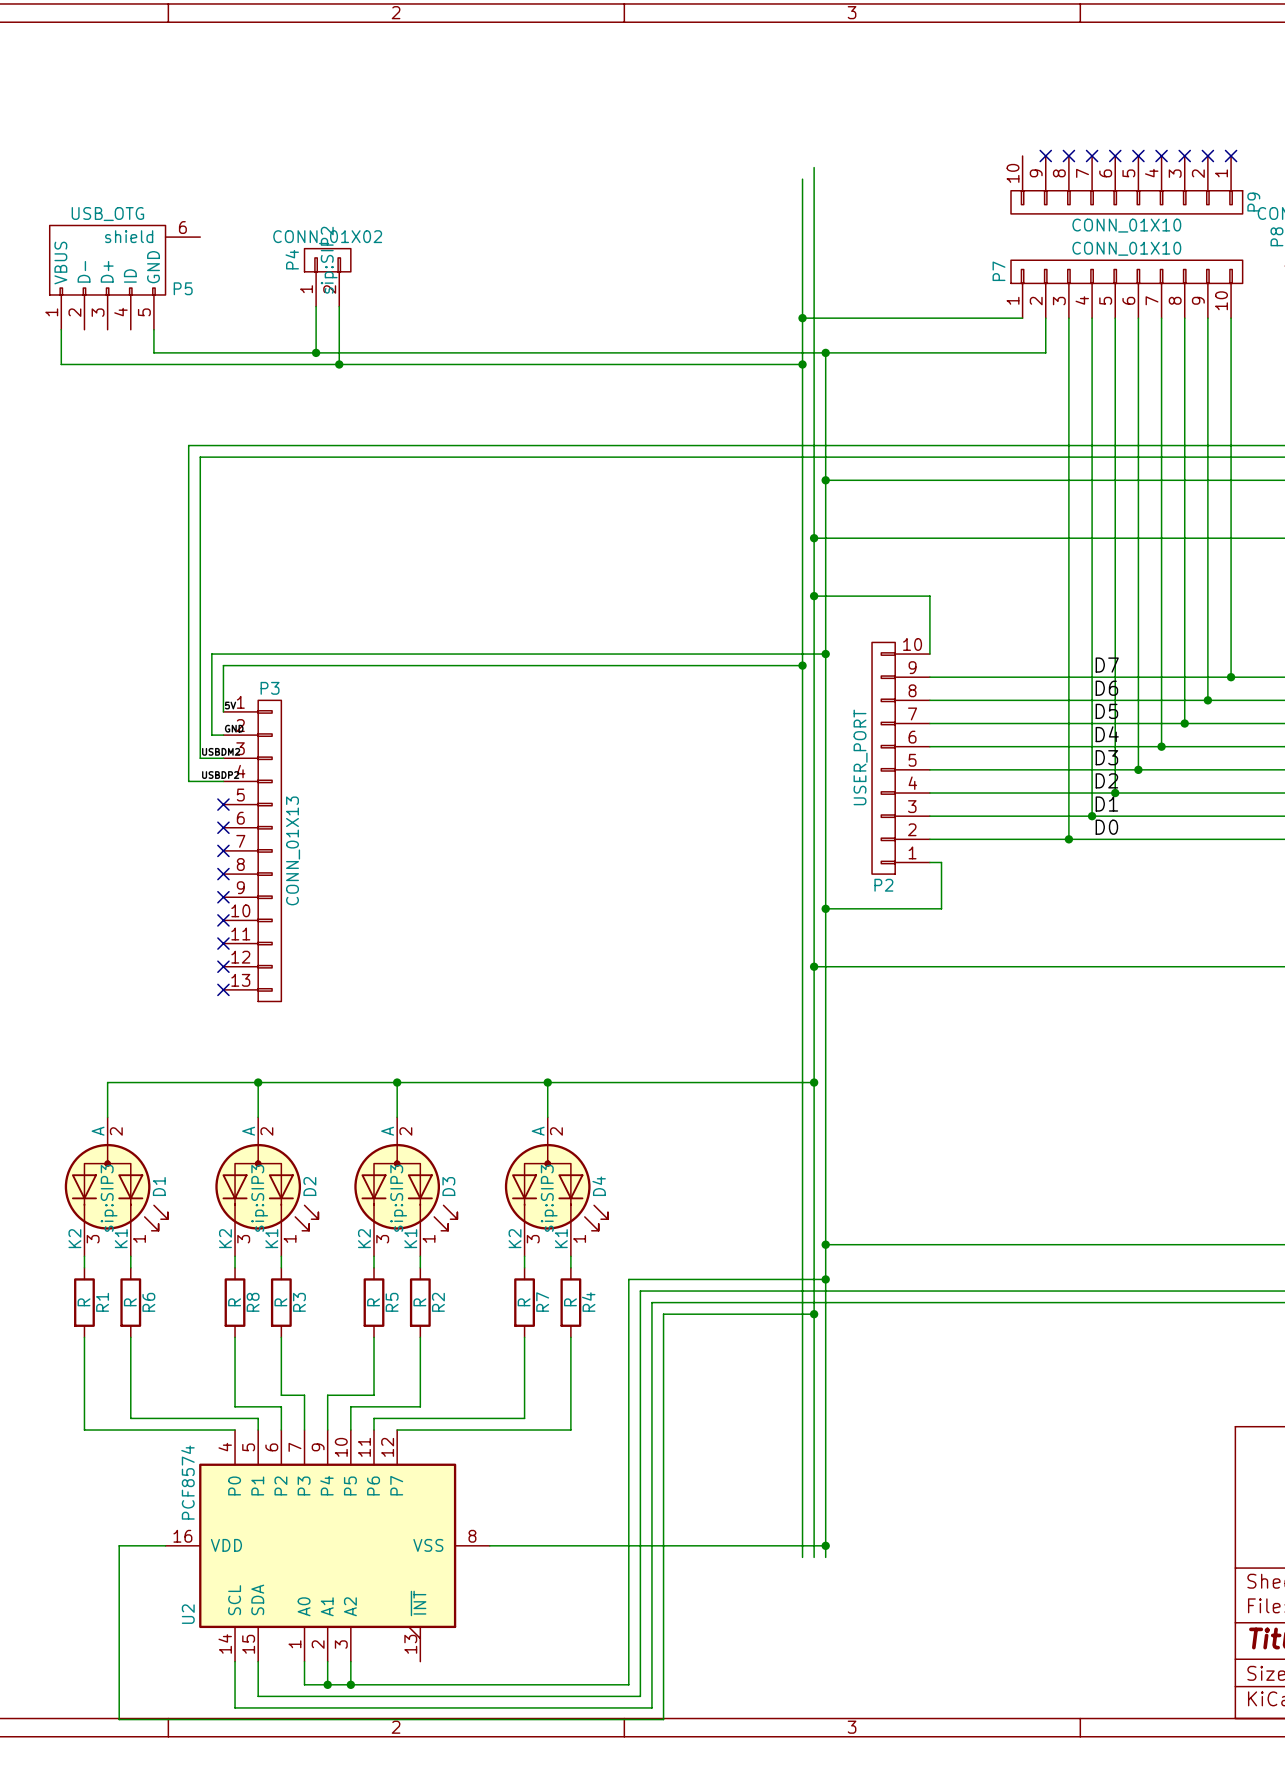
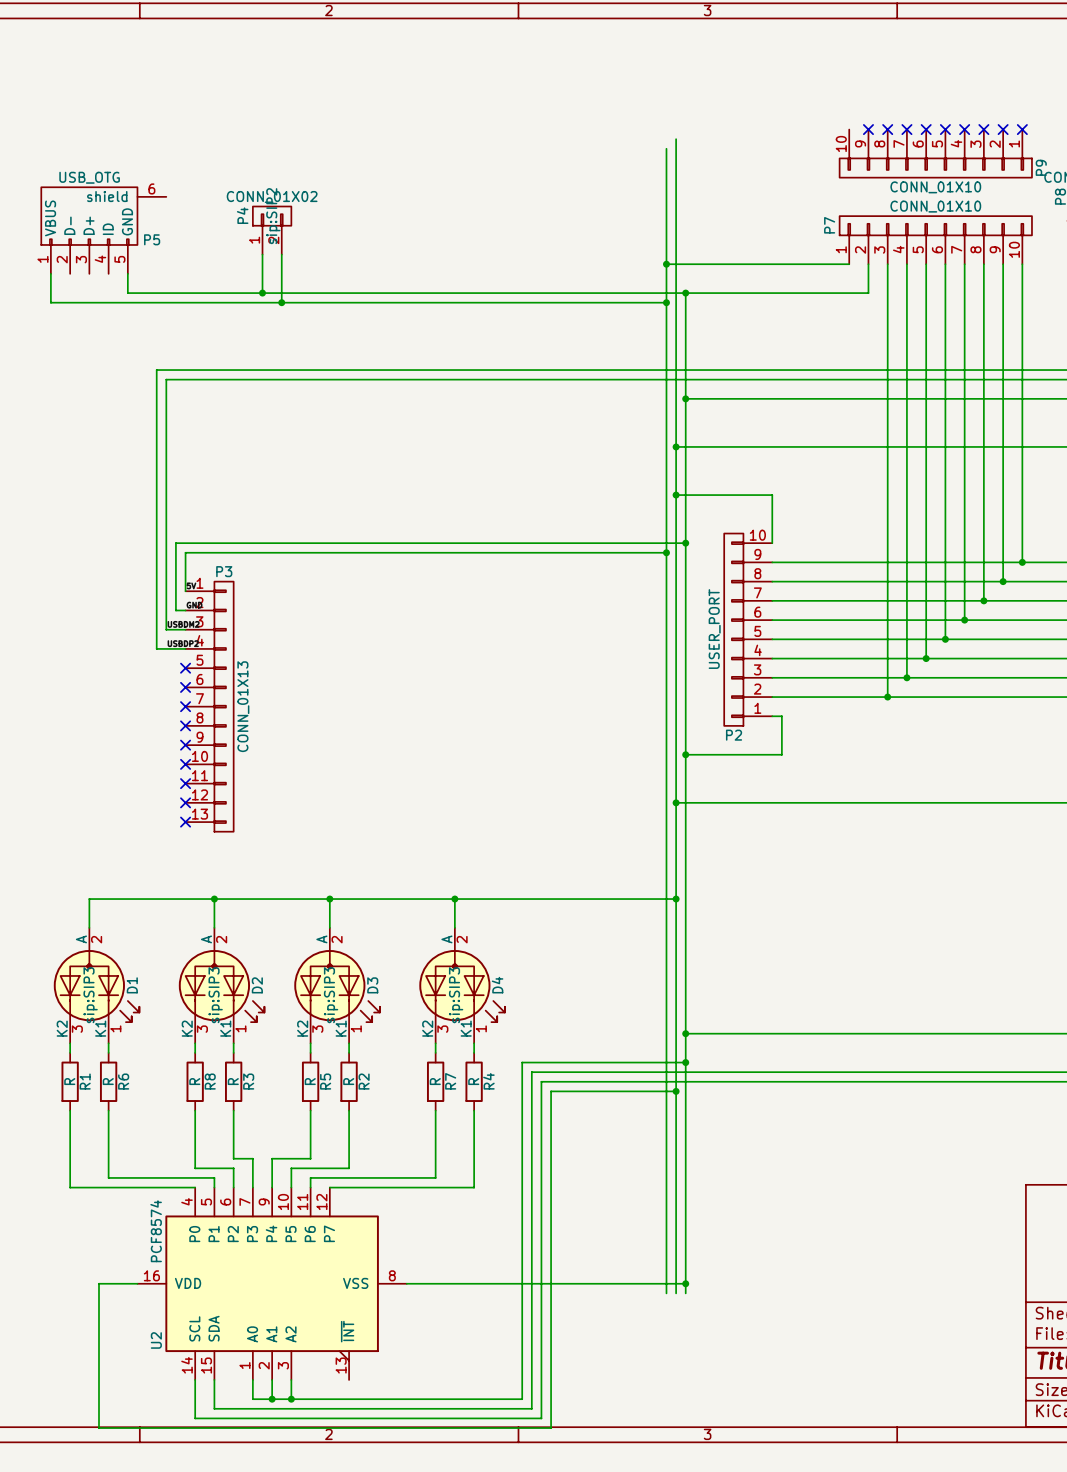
label: D7 (1107, 665) -> none
label: D6 (1106, 688) -> none
label: D5 (1106, 711) -> none
label: D4 (1107, 734) -> none
label: D3 (1106, 757) -> none
label: D2 (1106, 780) -> none
label: D1 (1106, 804) -> none
label: D0 (1106, 827) -> none

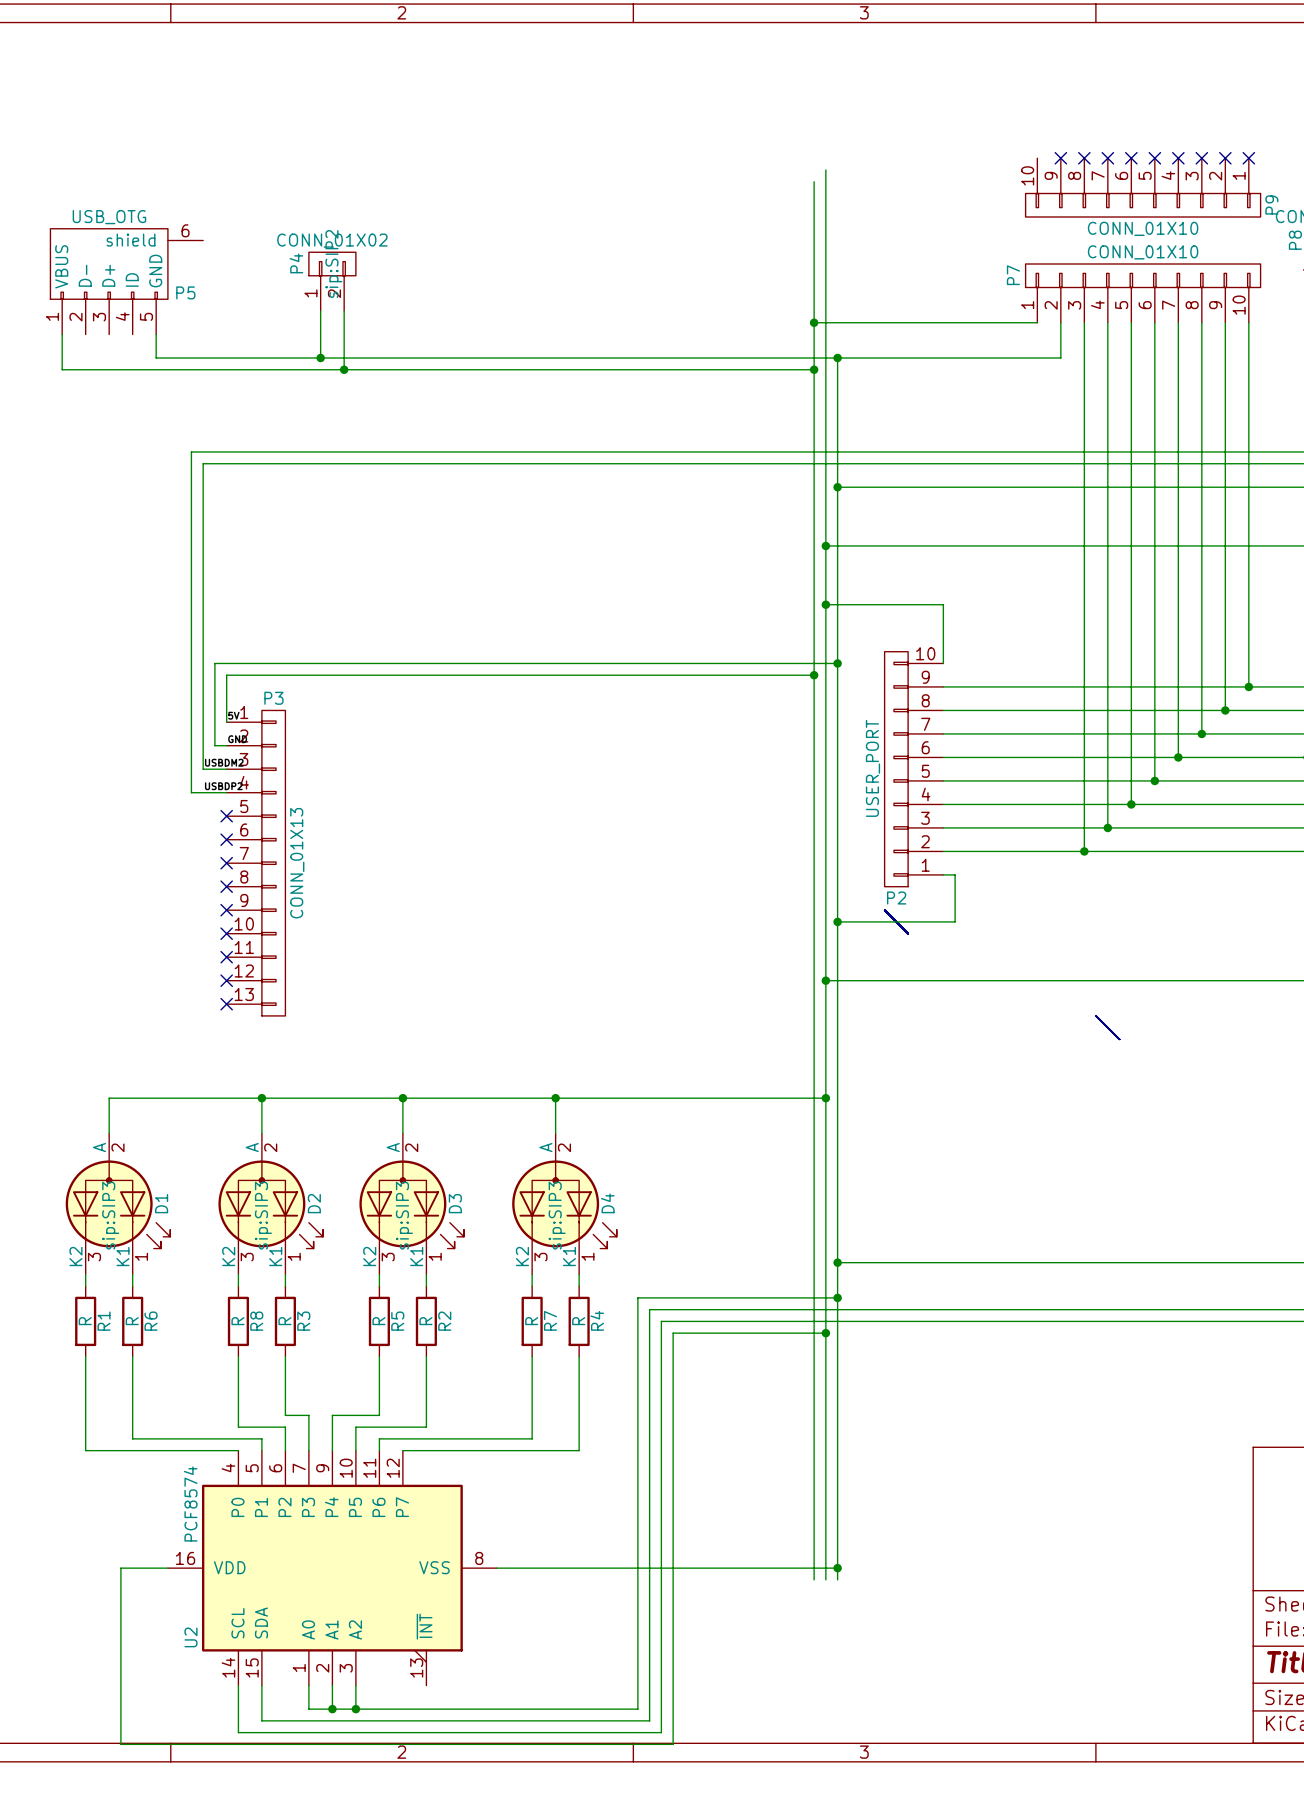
bus: none -> (884, 910) (908, 933)
bus: none -> (1096, 1015) (1119, 1039)

